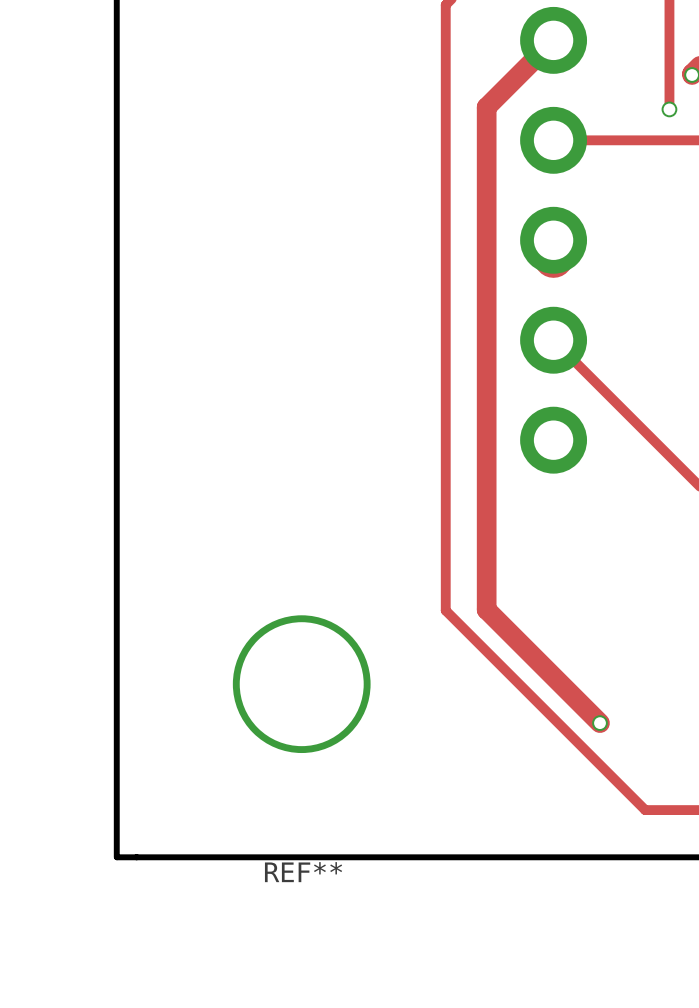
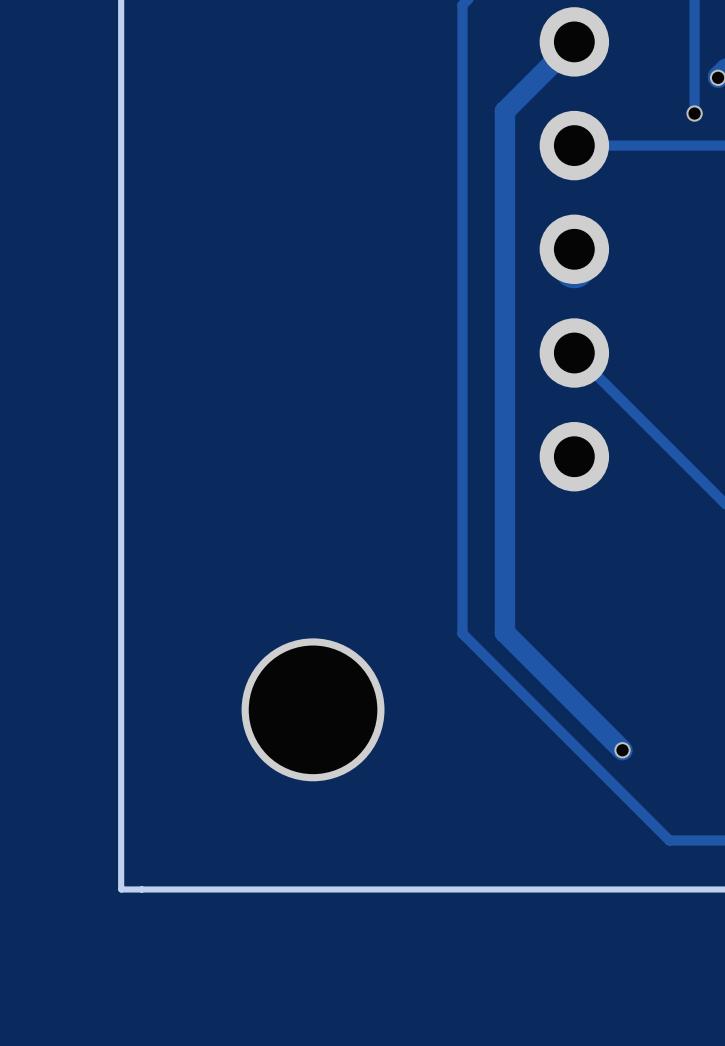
REF** name: REF** (303, 872) -> none

